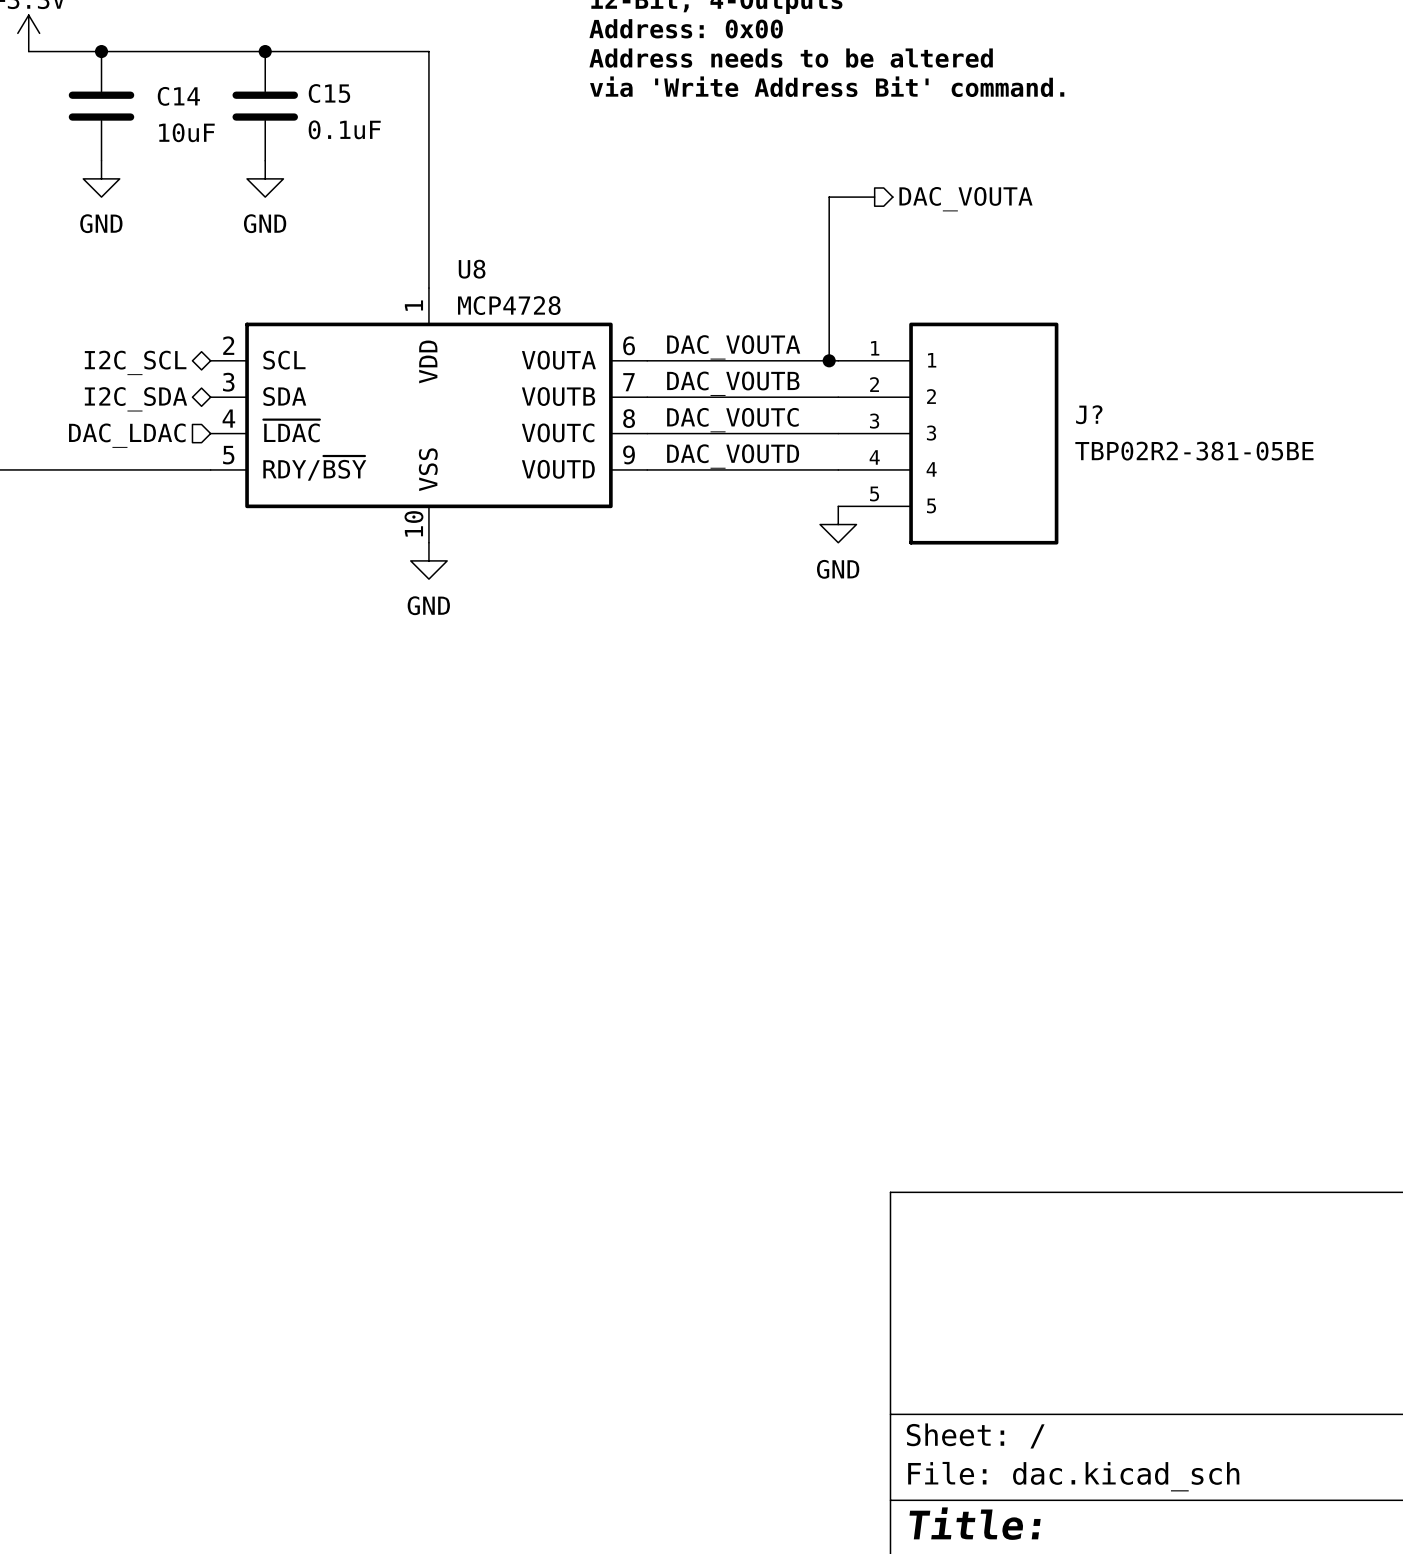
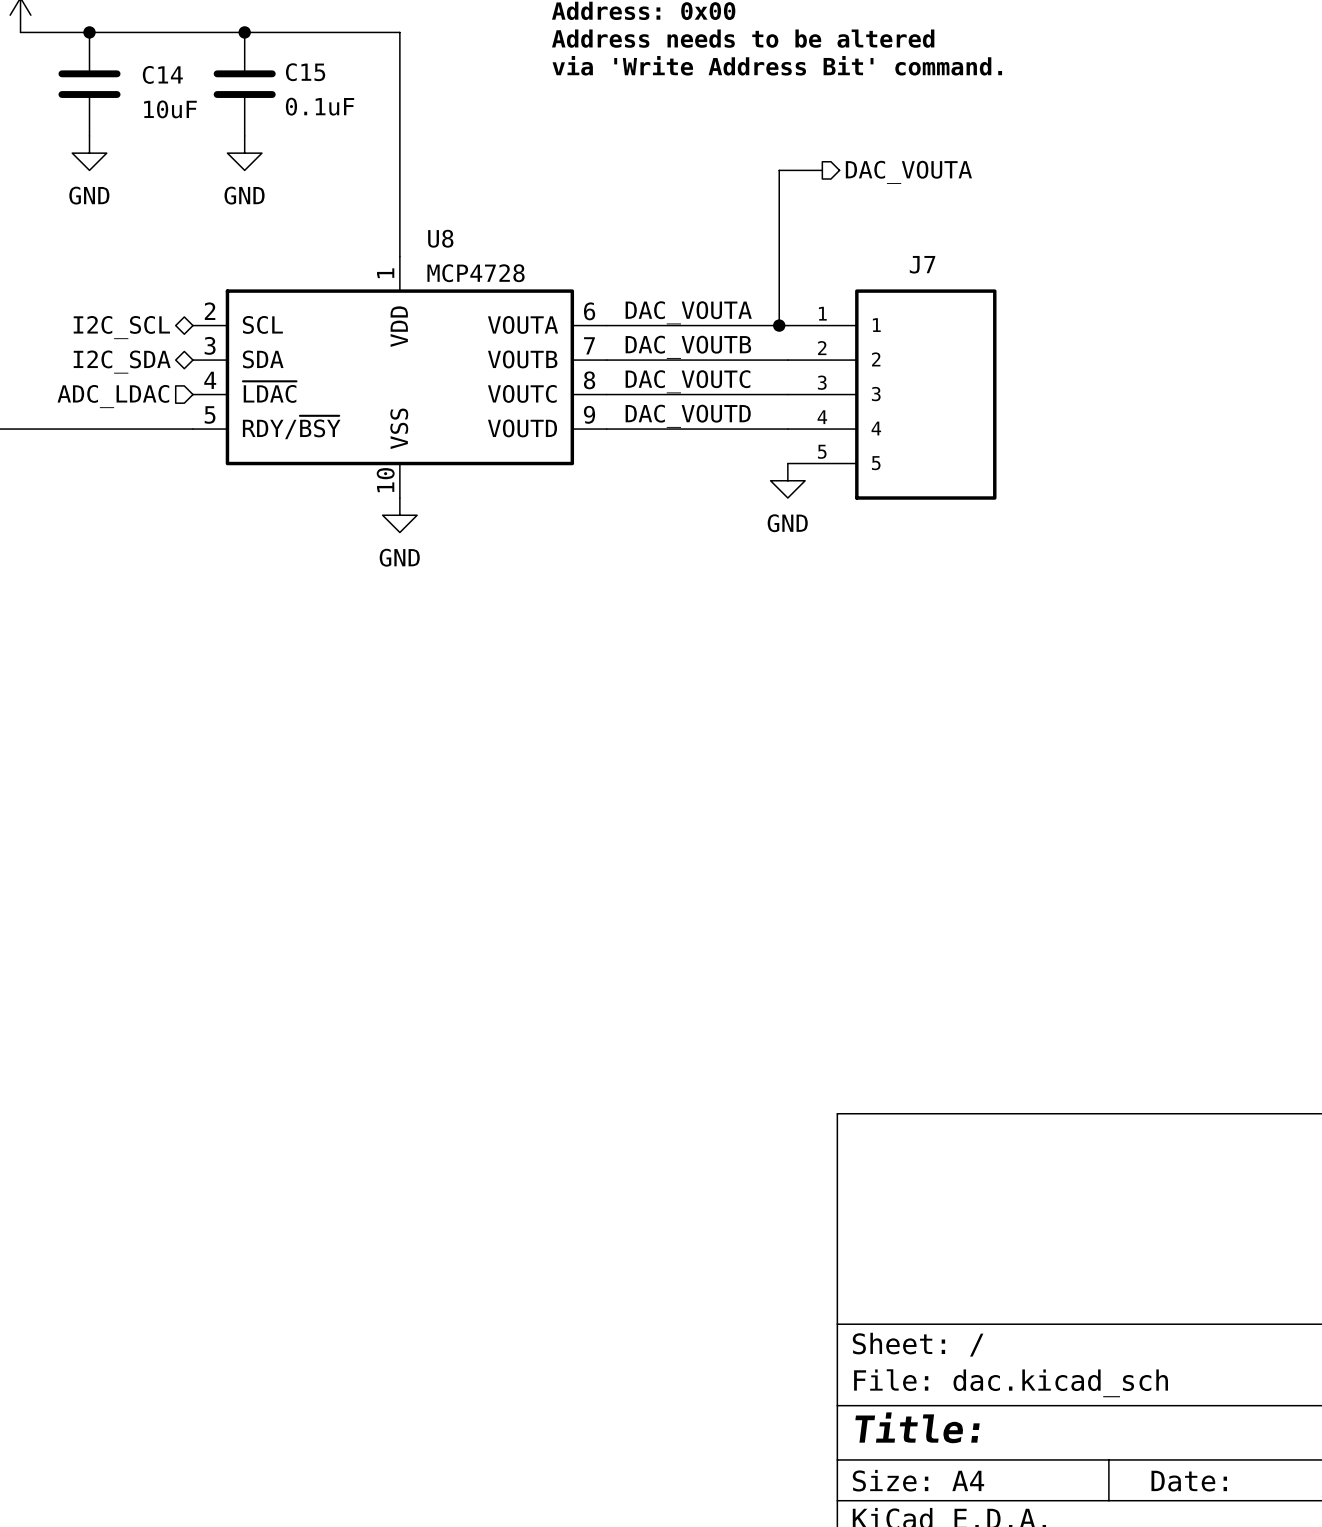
J? name: J? (1089, 414) -> J7 (922, 264)
hierarchical label: DAC_LDAC (127, 435) -> ADC_LDAC (113, 396)
J? value: TBP02R2-381-05BE (1194, 451) -> none

